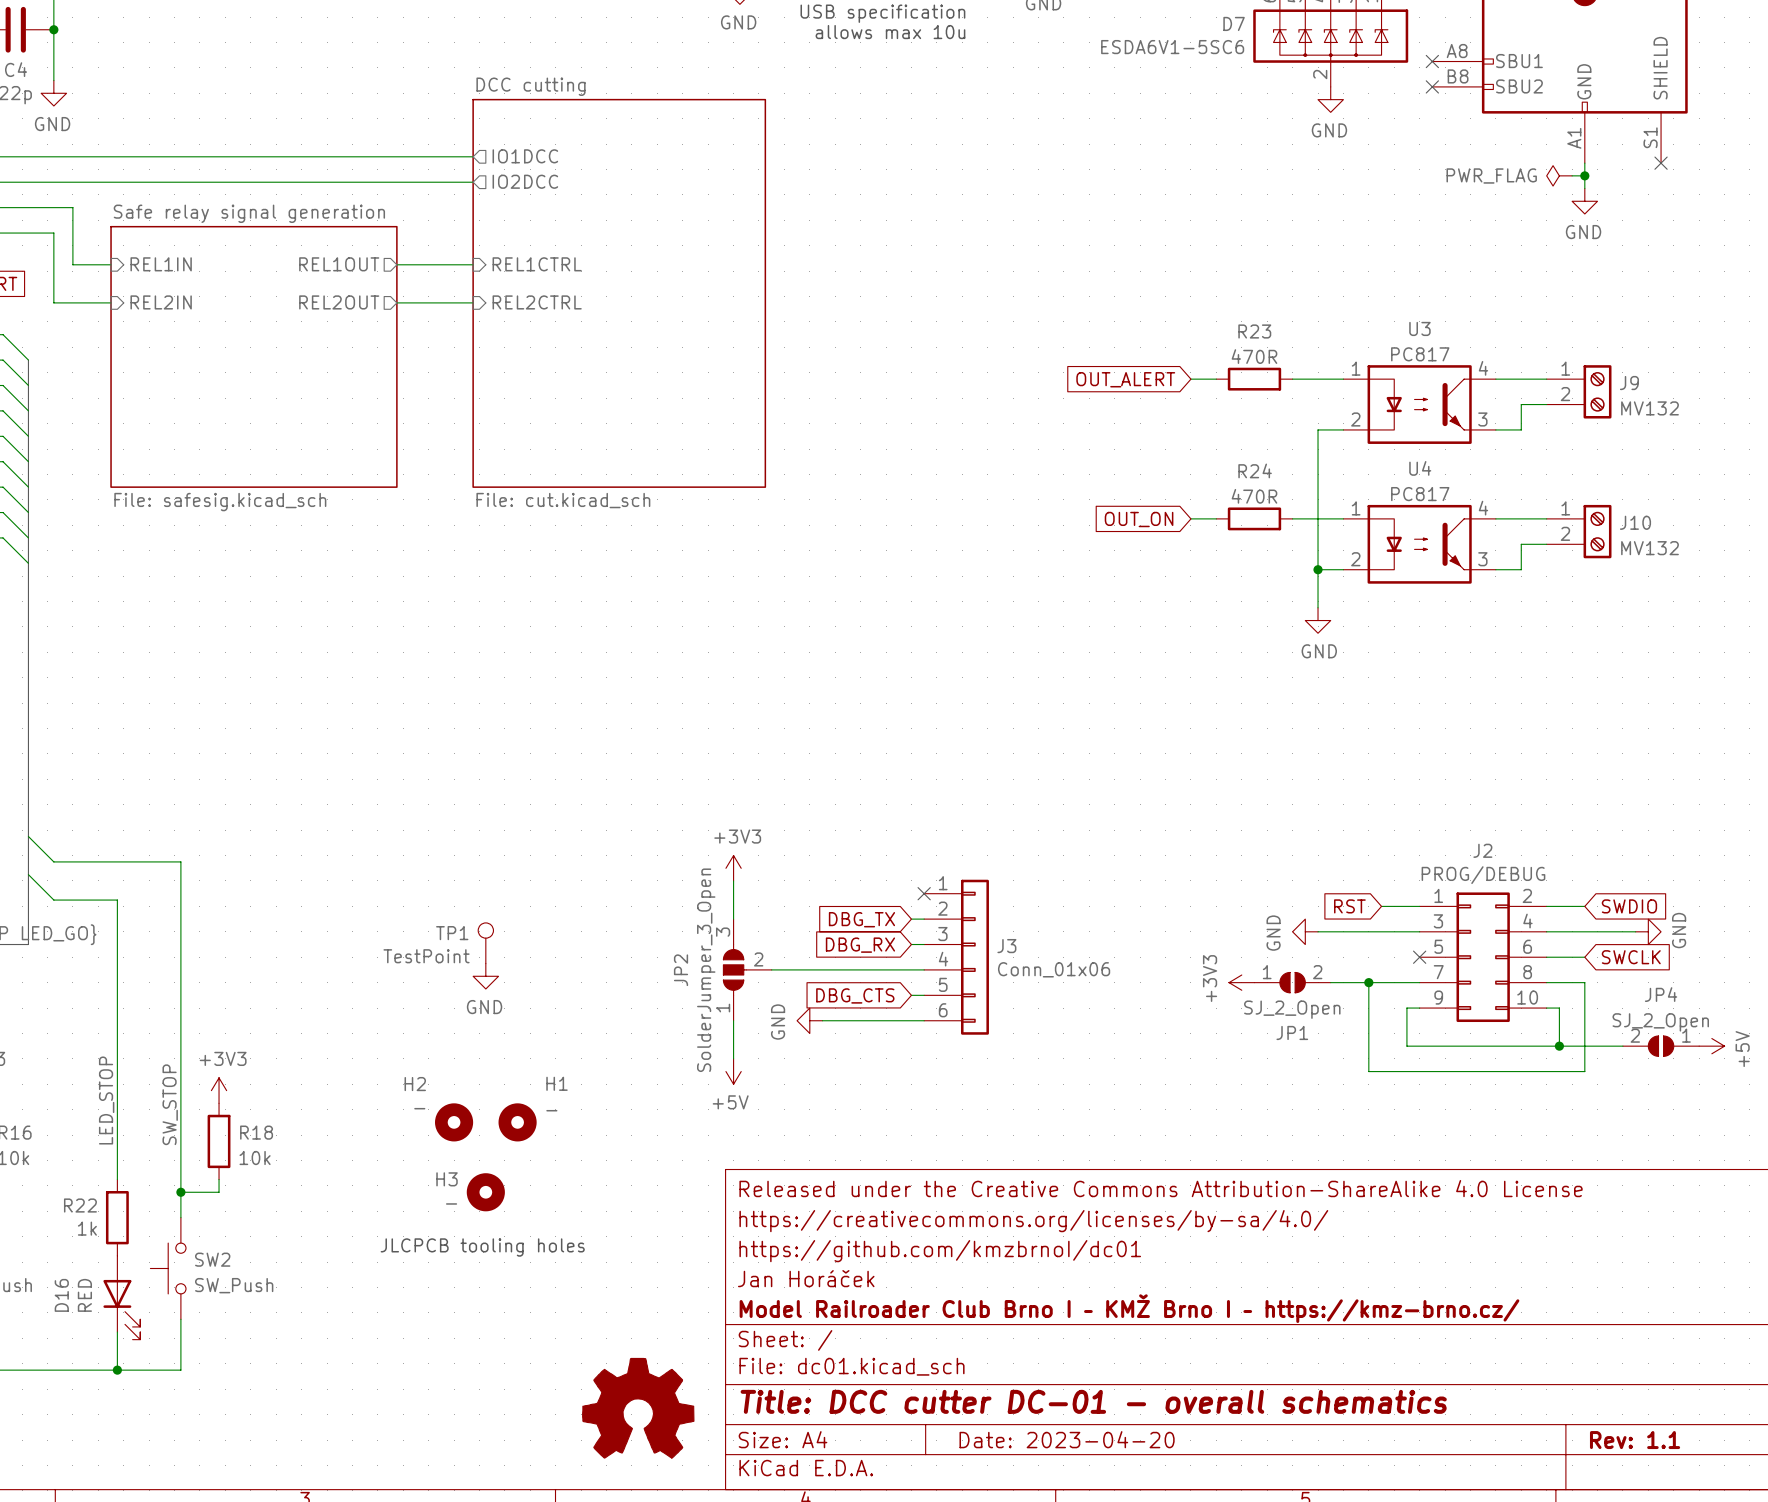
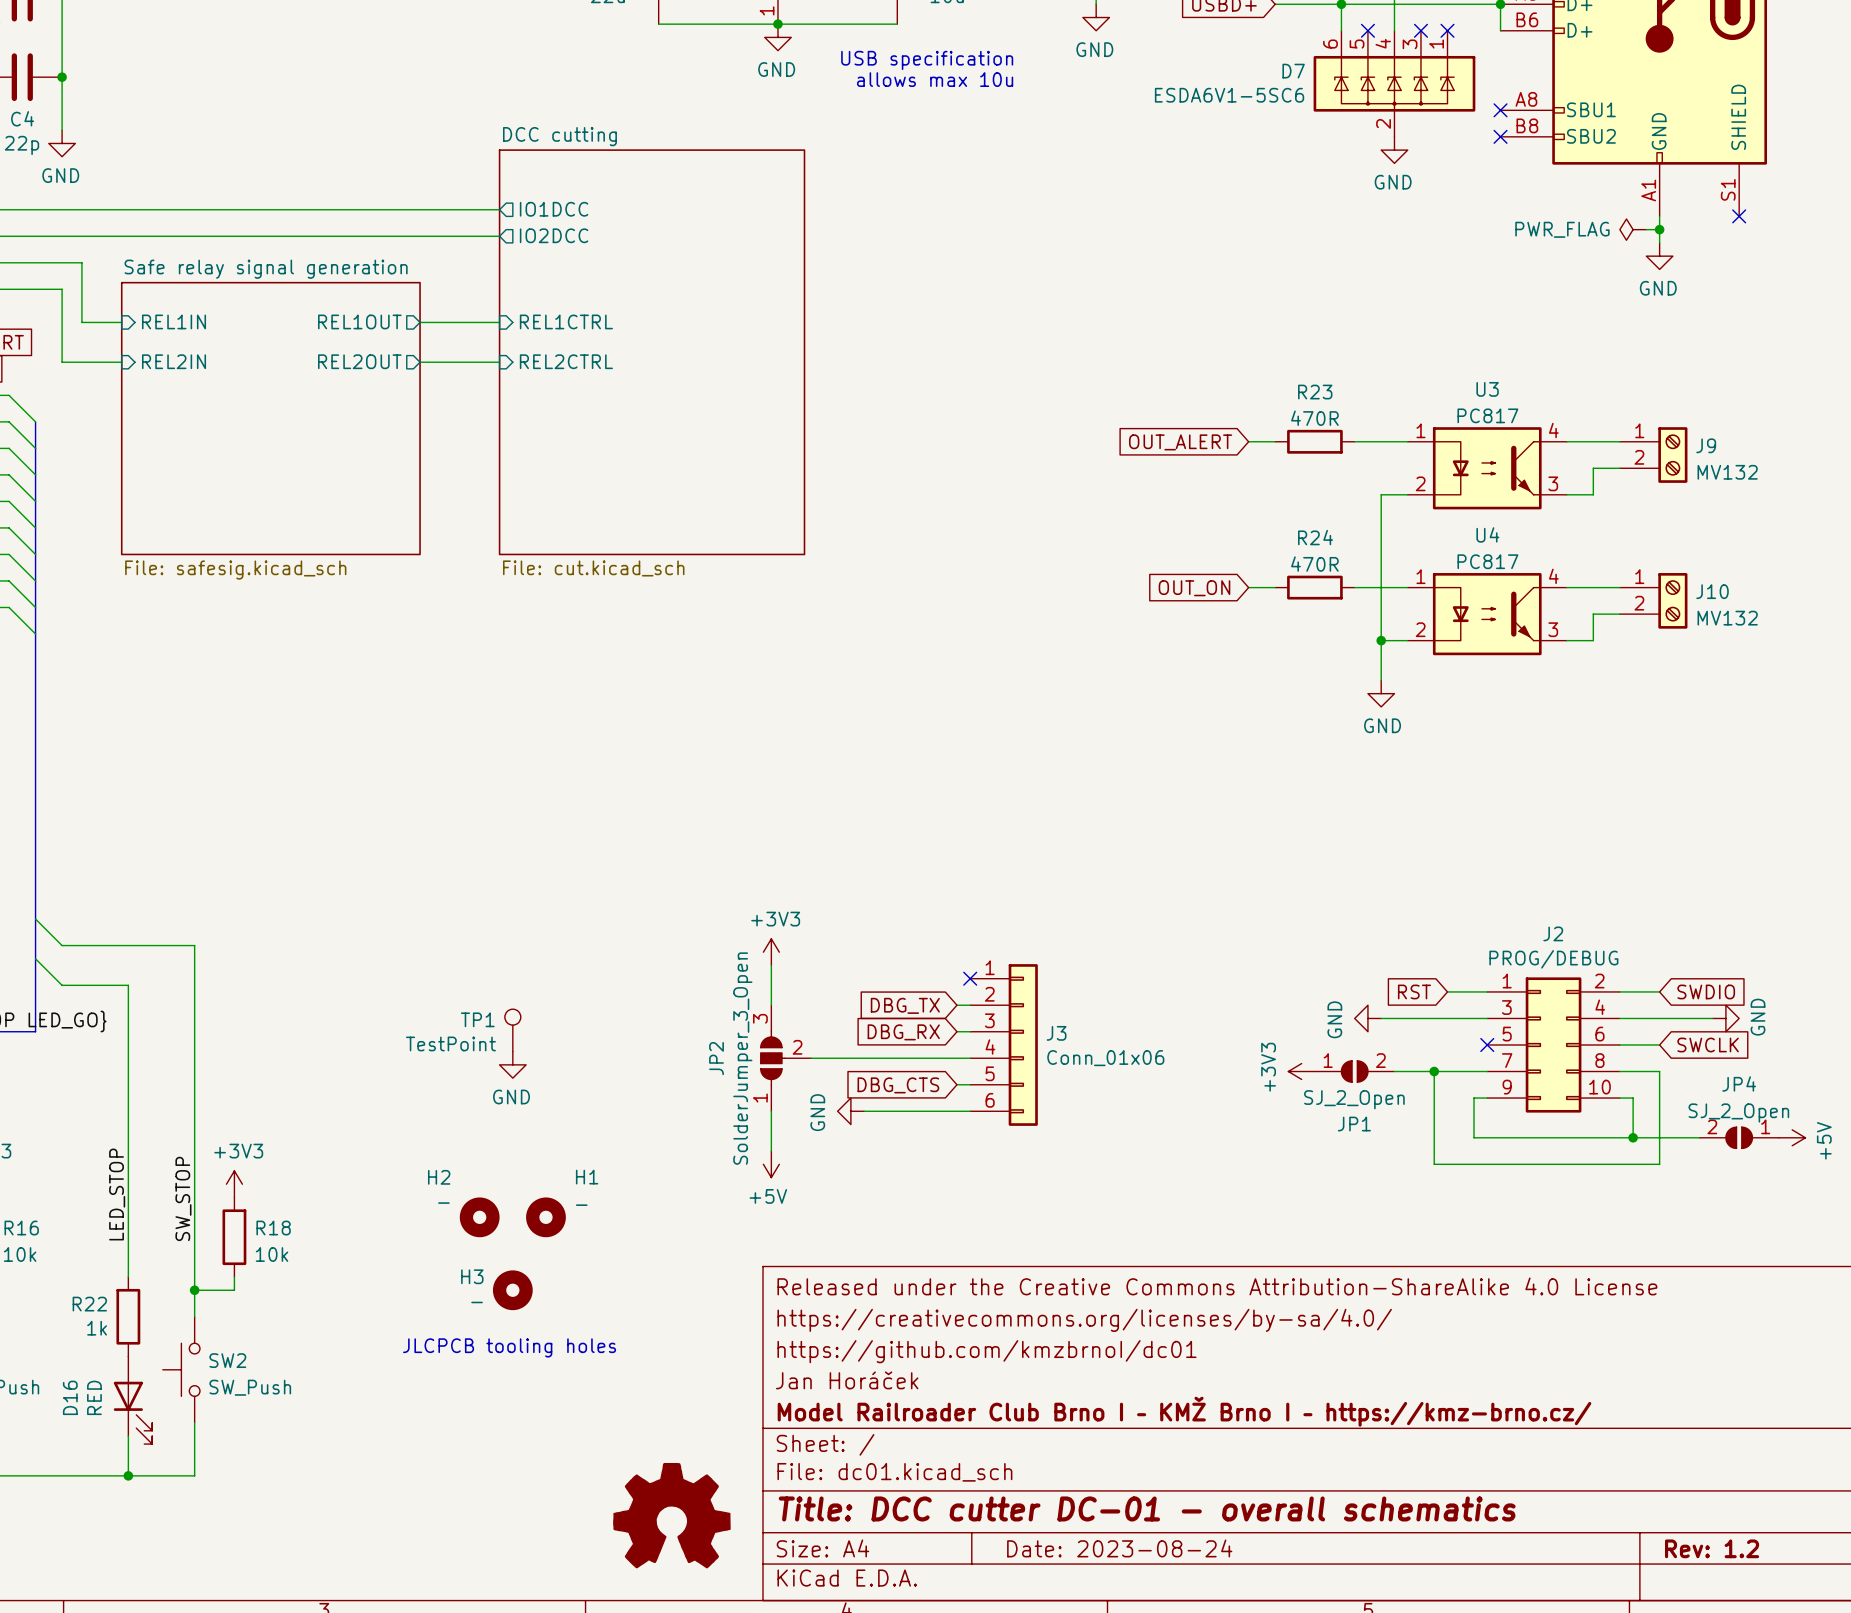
title block: Date: 2023-04-20 (1067, 1439) -> Date: 2023-08-24 (1119, 1548)
title block: Rev: 1.1 (1635, 1440) -> Rev: 1.2 (1712, 1548)

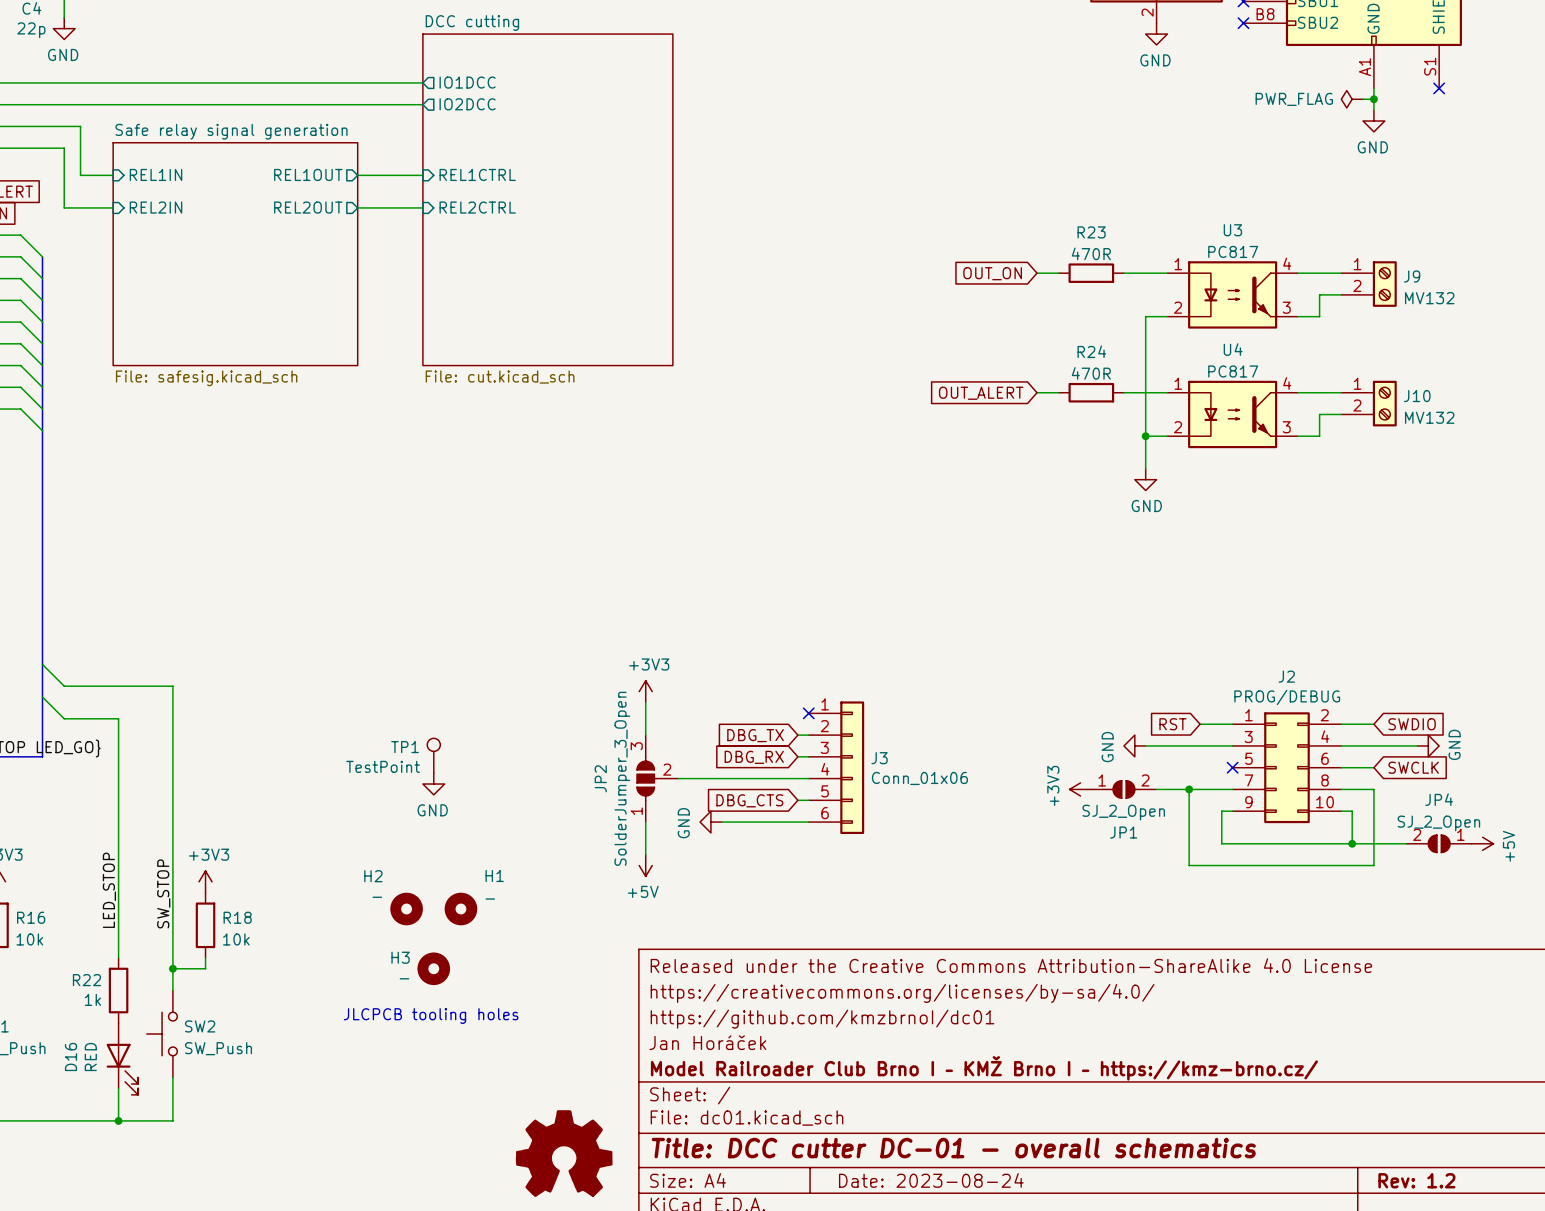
global label: OUT_ALERT (1180, 442) -> OUT_ON (992, 273)
global label: OUT_ON (1194, 588) -> OUT_ALERT (981, 393)

